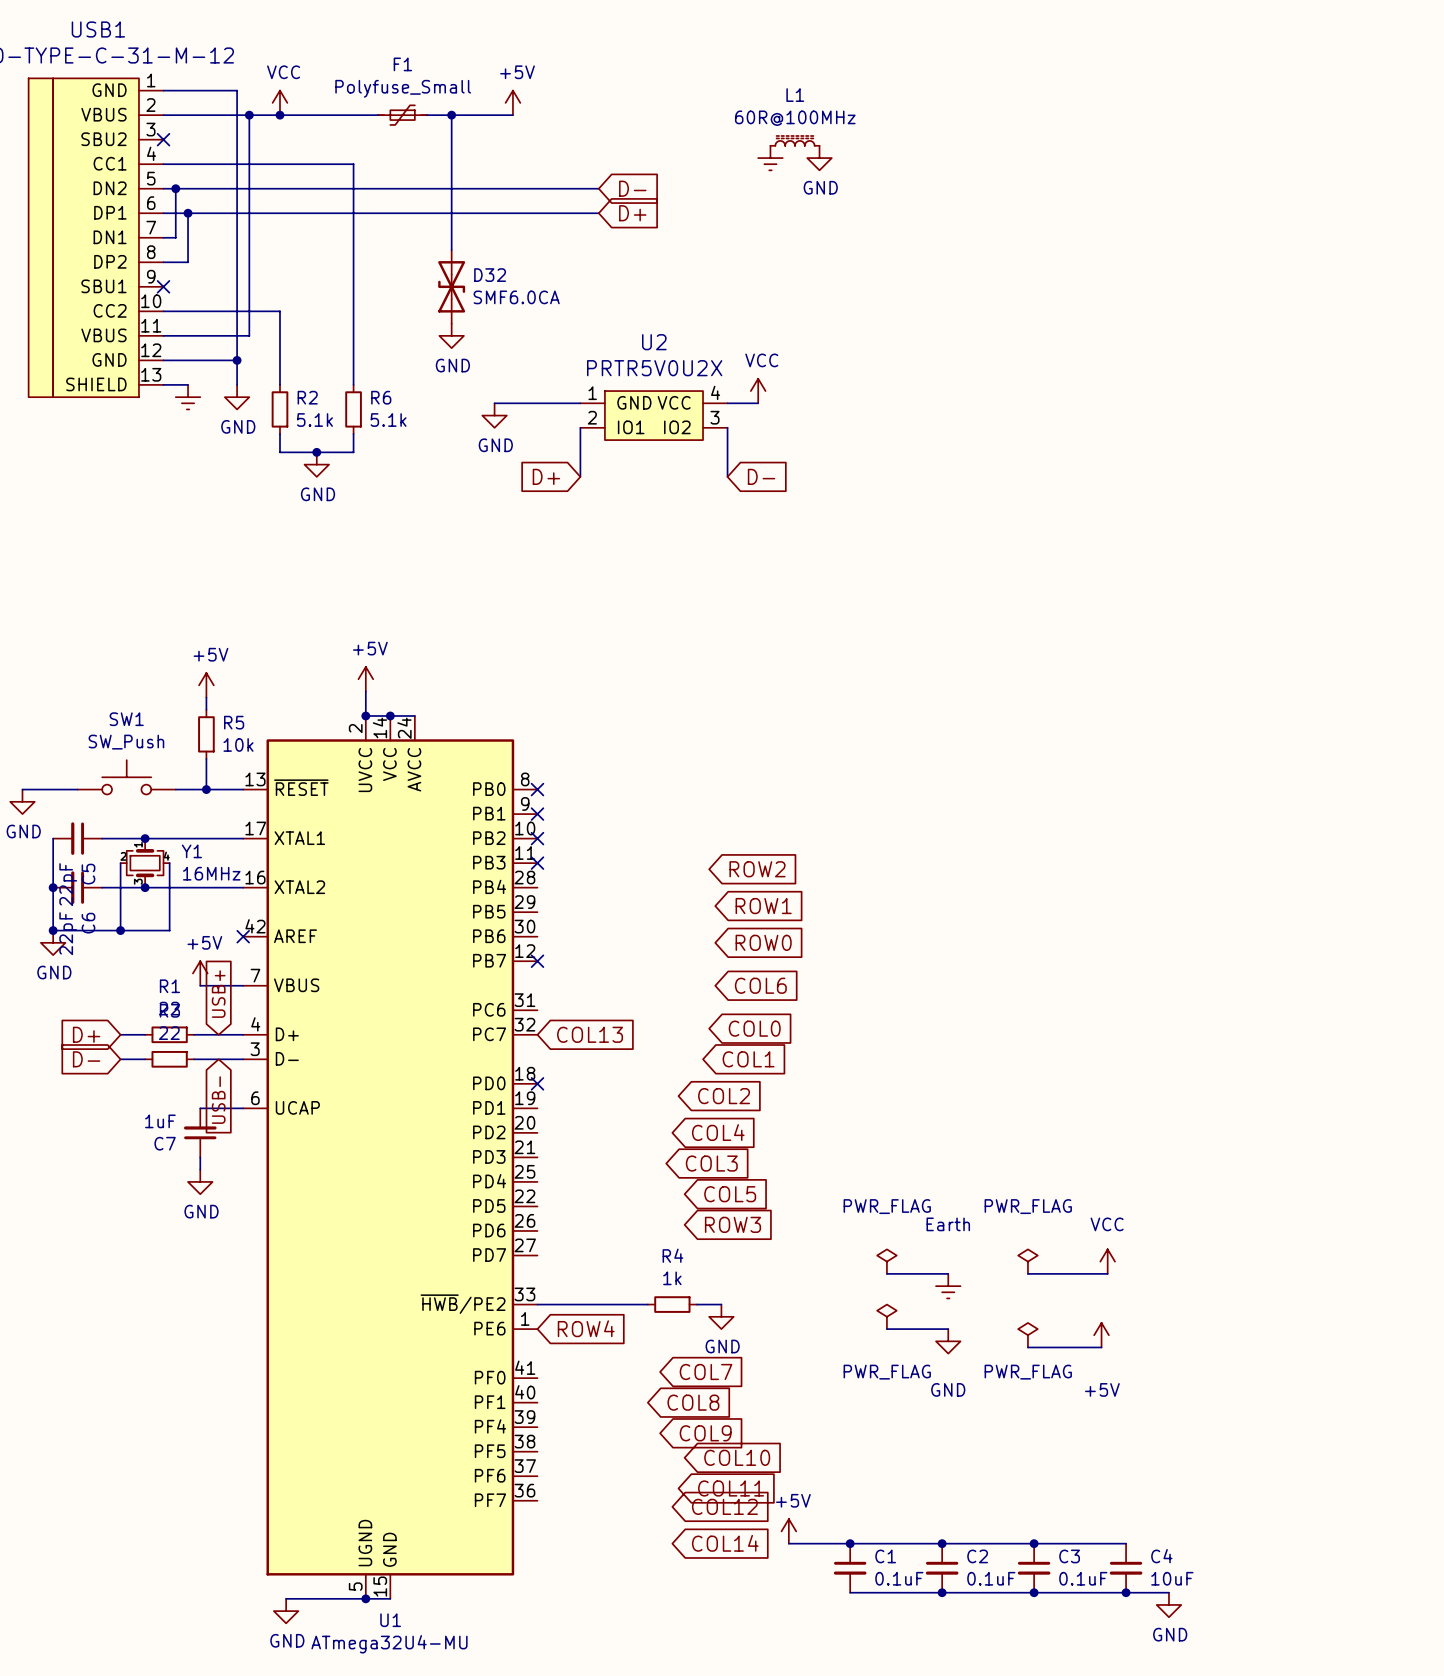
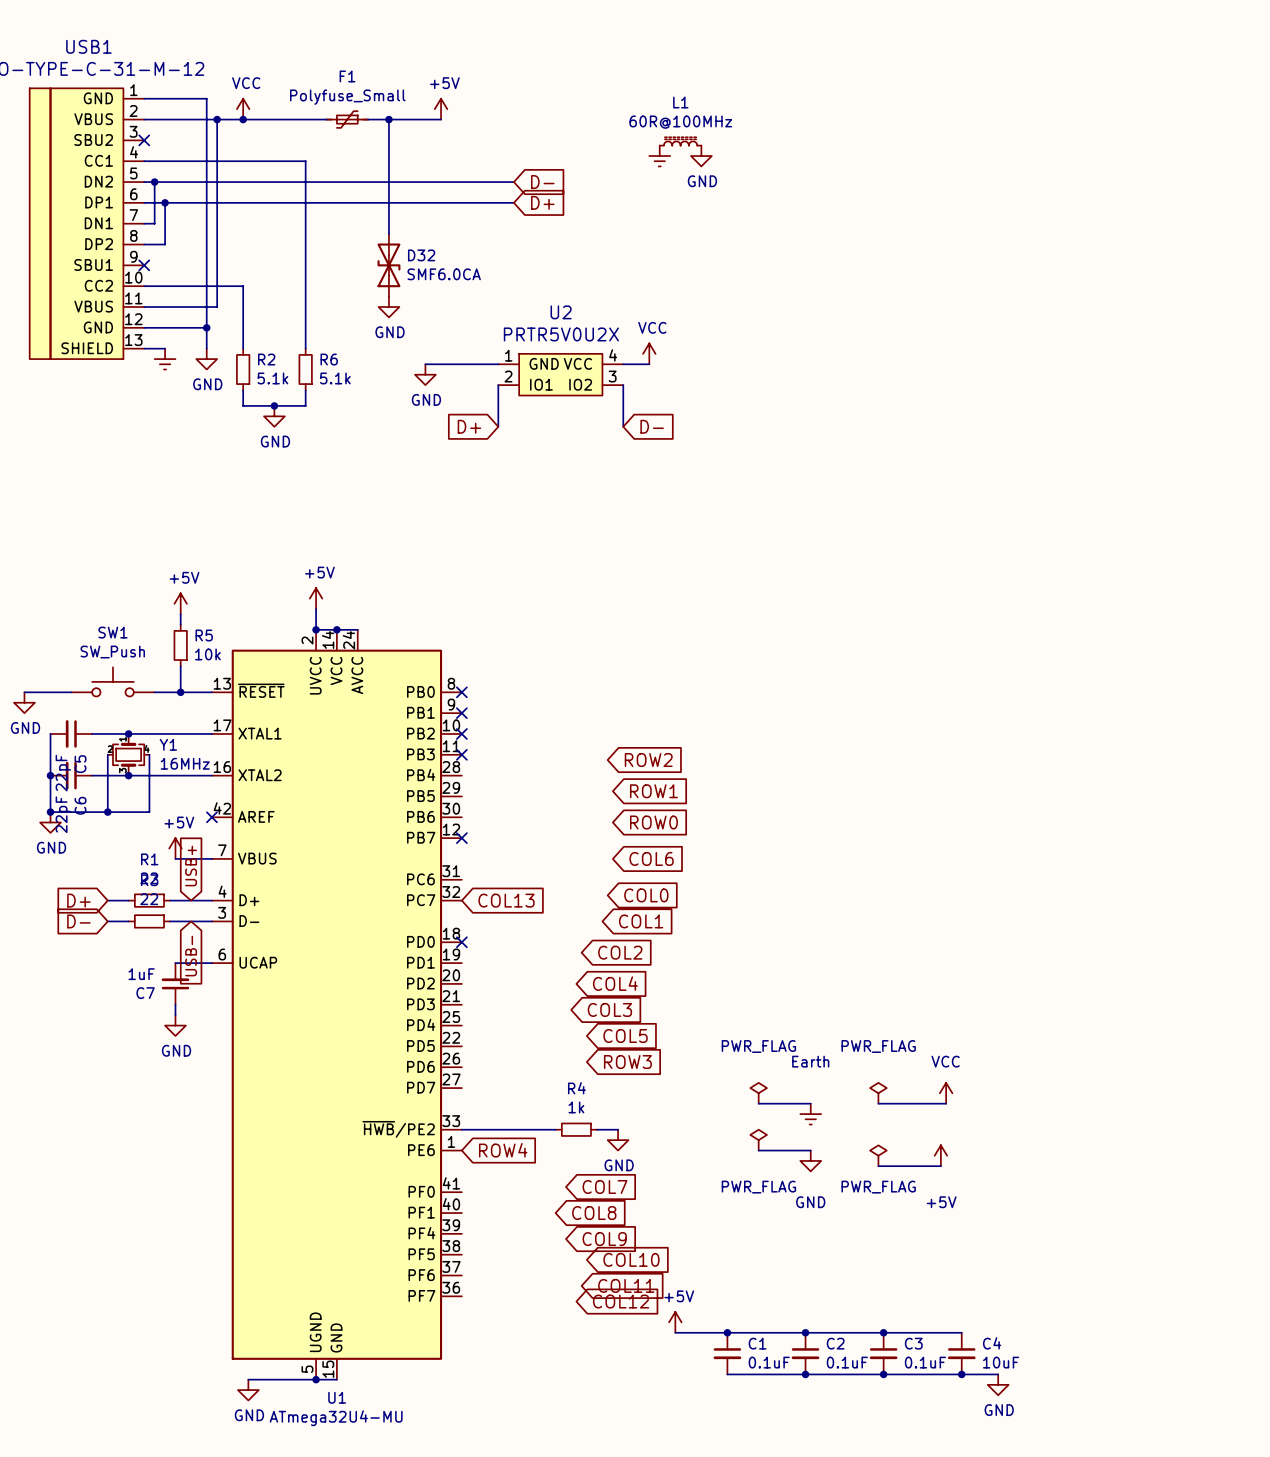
global label: COL14 (725, 1543) -> none

